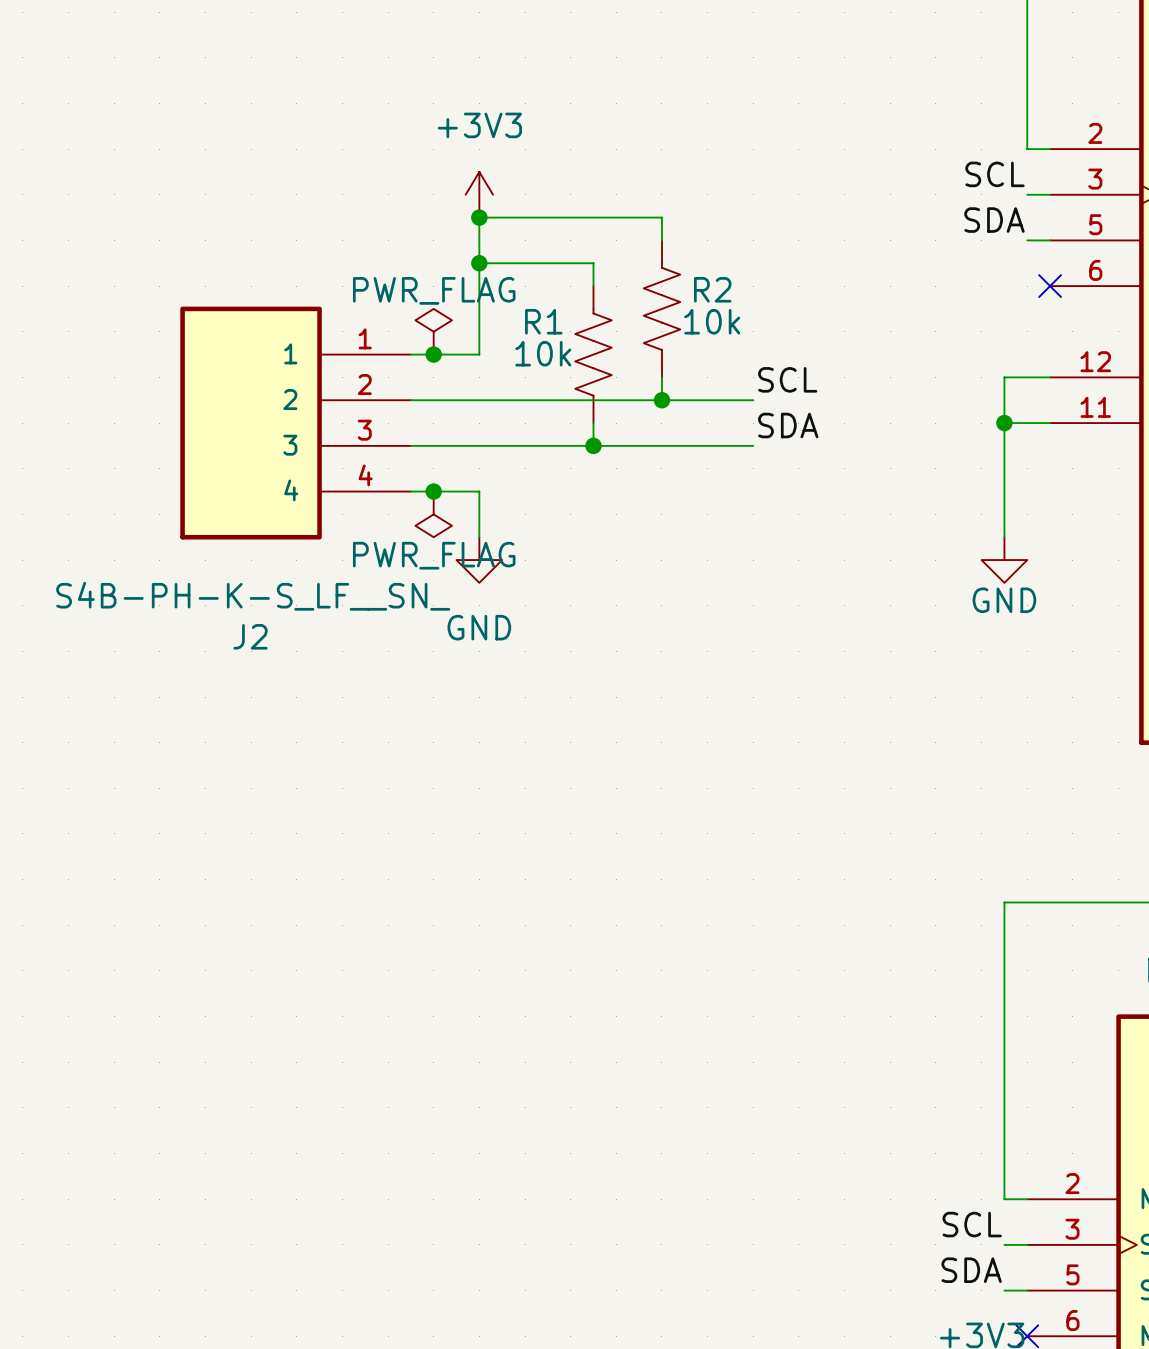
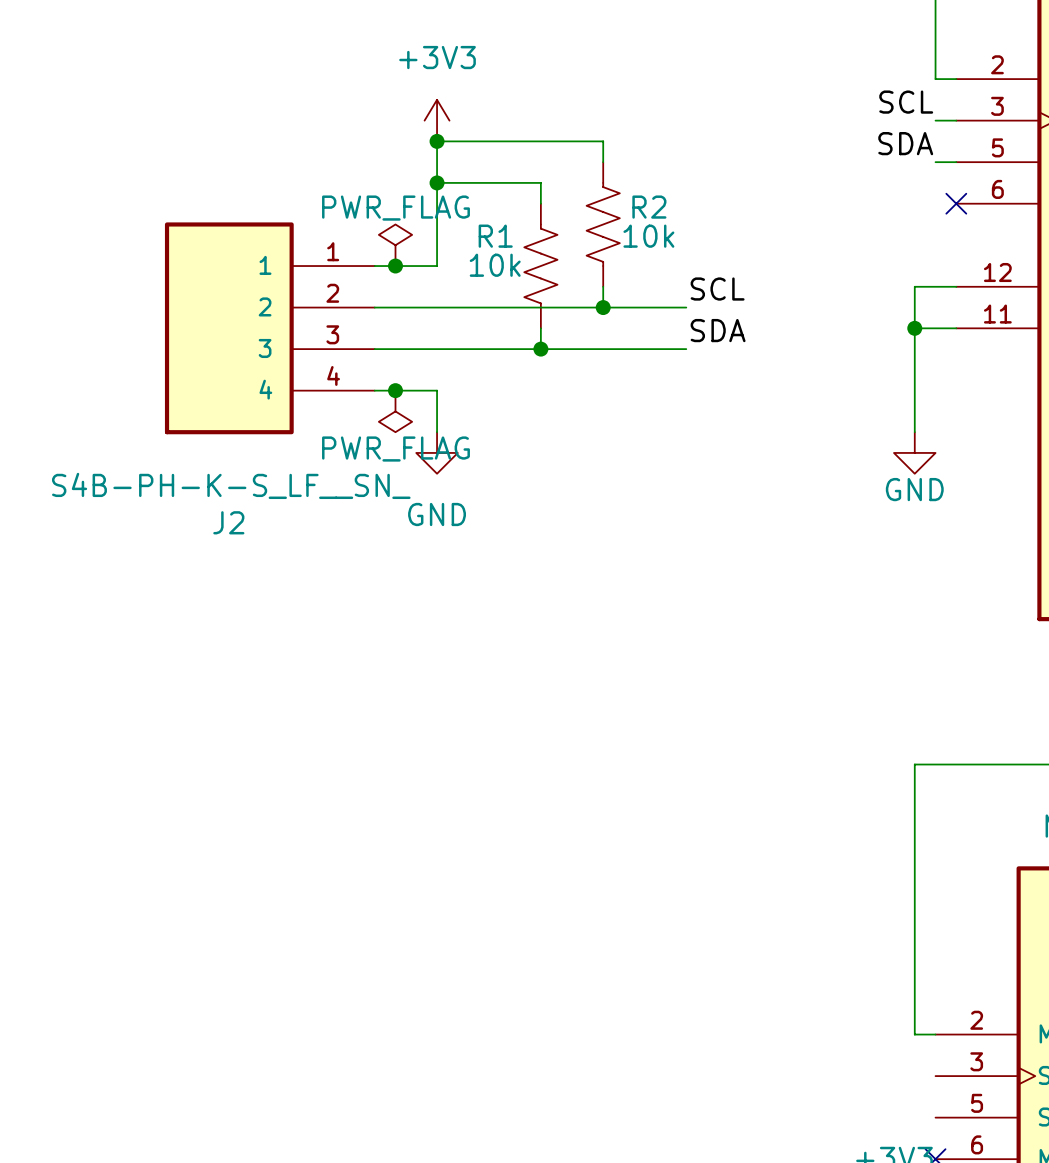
label: SCL (972, 1224) -> none
wire: (1004, 1244) (1027, 1244) -> none
label: SDA (971, 1270) -> none
wire: (1004, 1290) (1027, 1290) -> none

